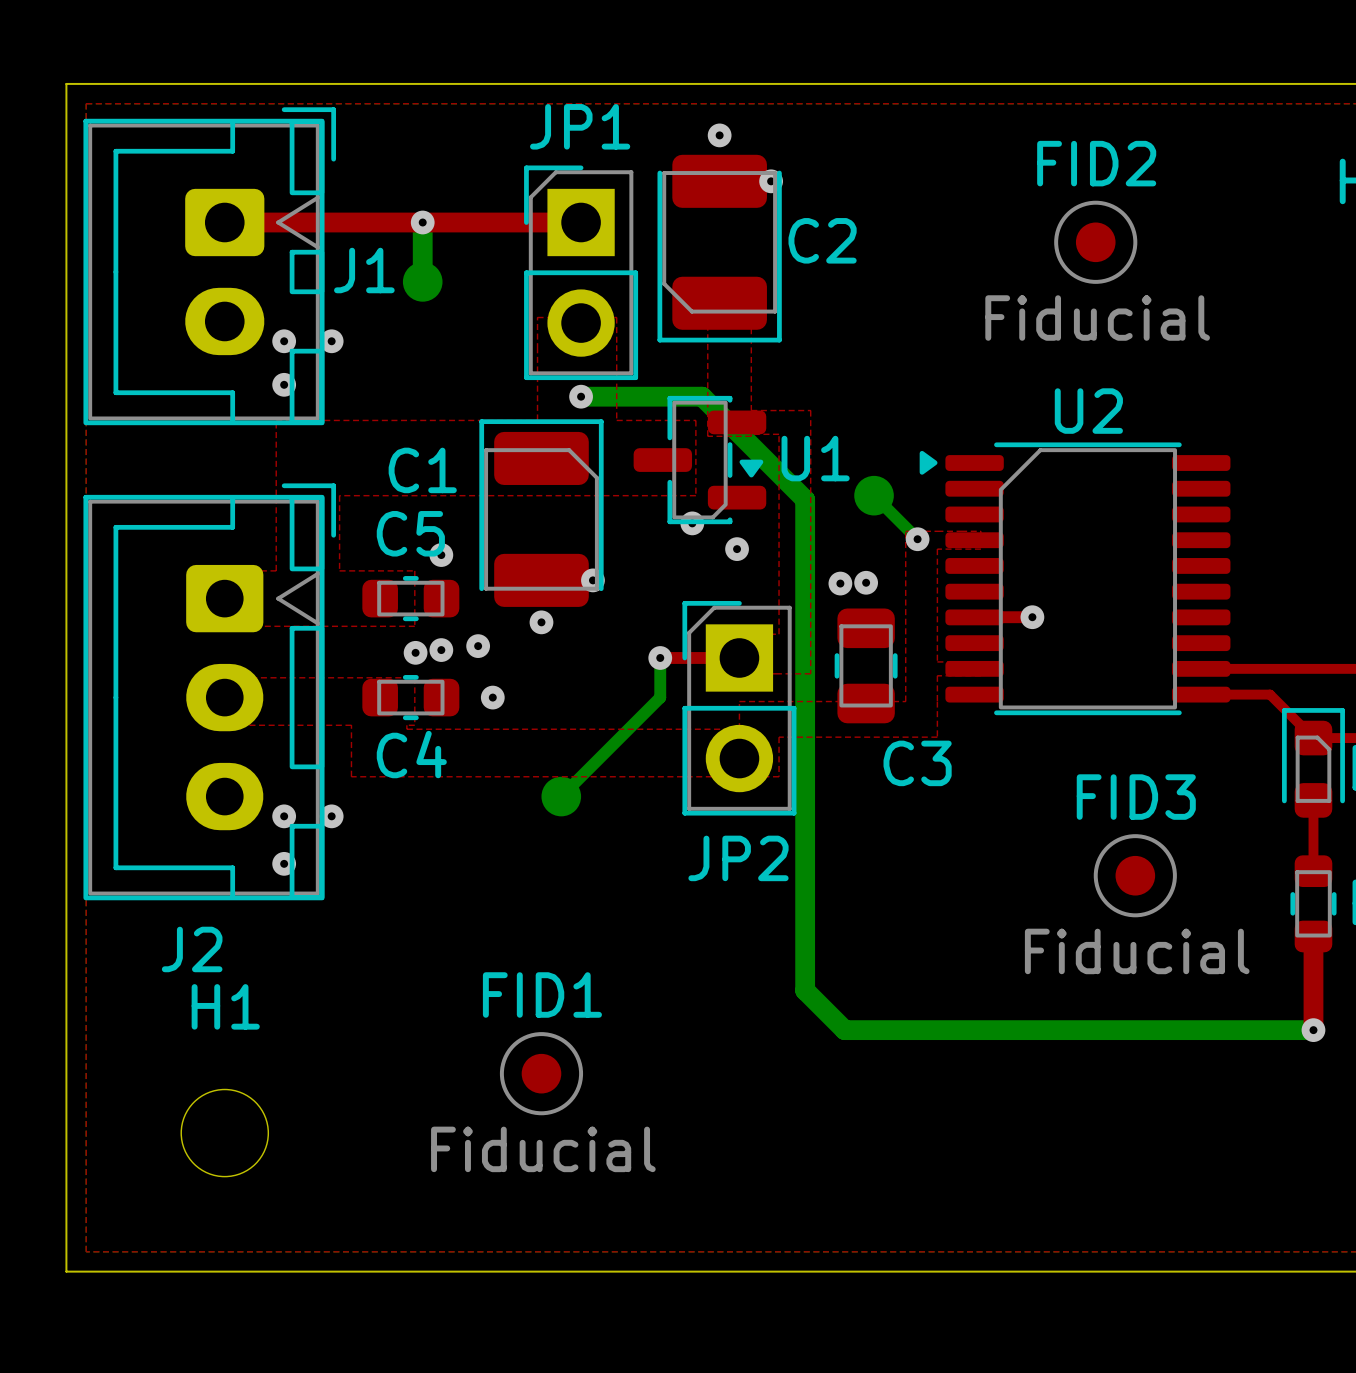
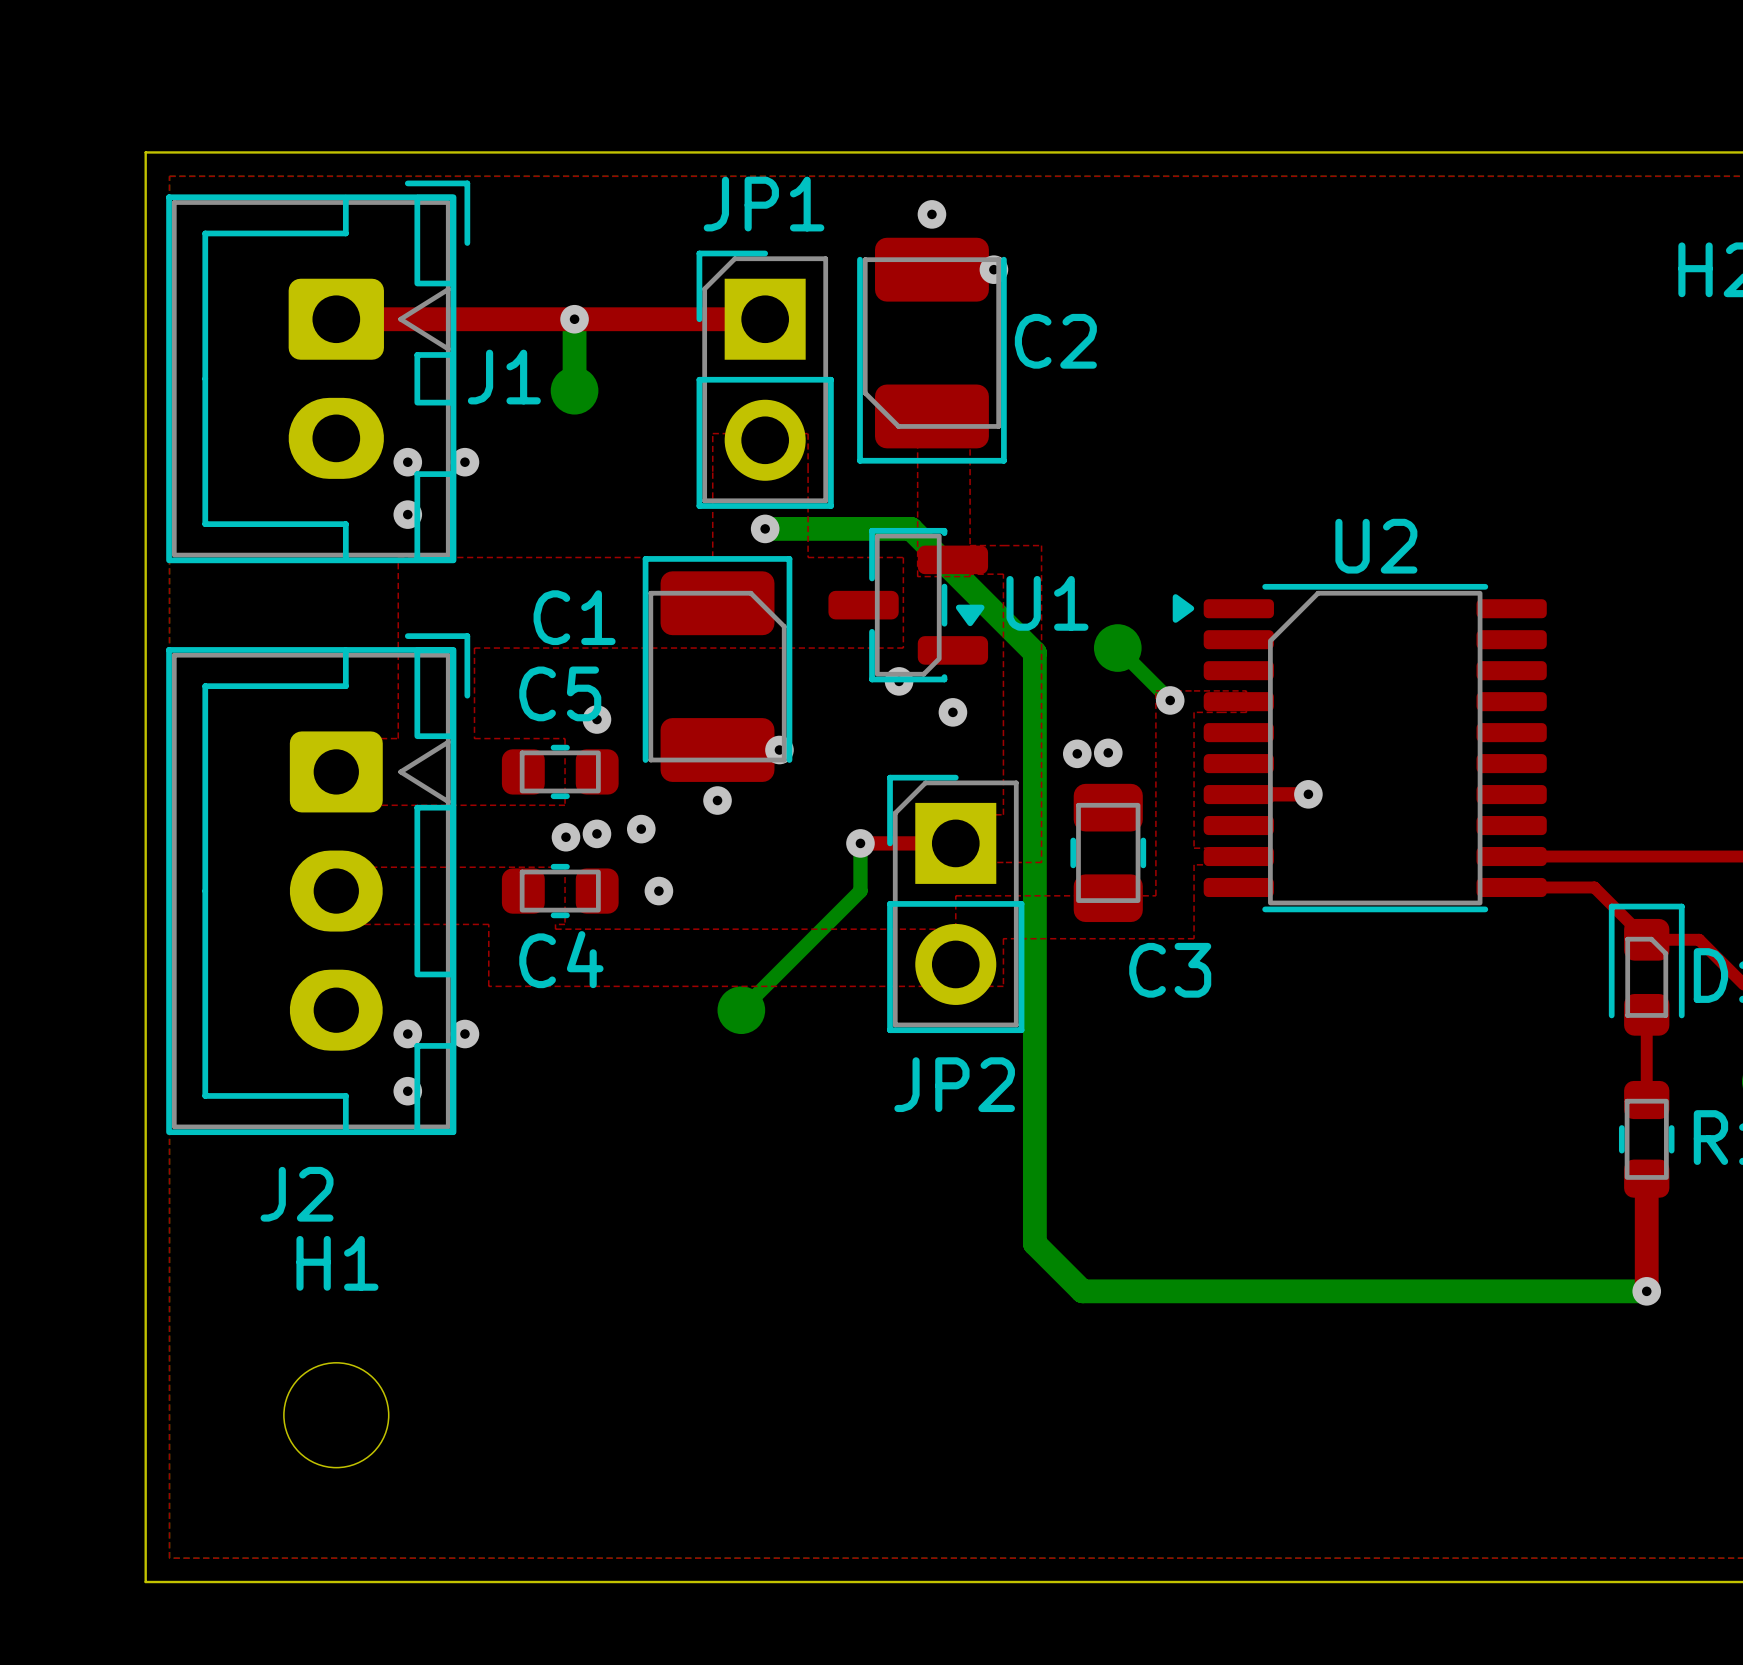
FID2: Fiducial (1095, 242) -> none
FID3: Fiducial (1135, 875) -> none
FID1: Fiducial (541, 1073) -> none

